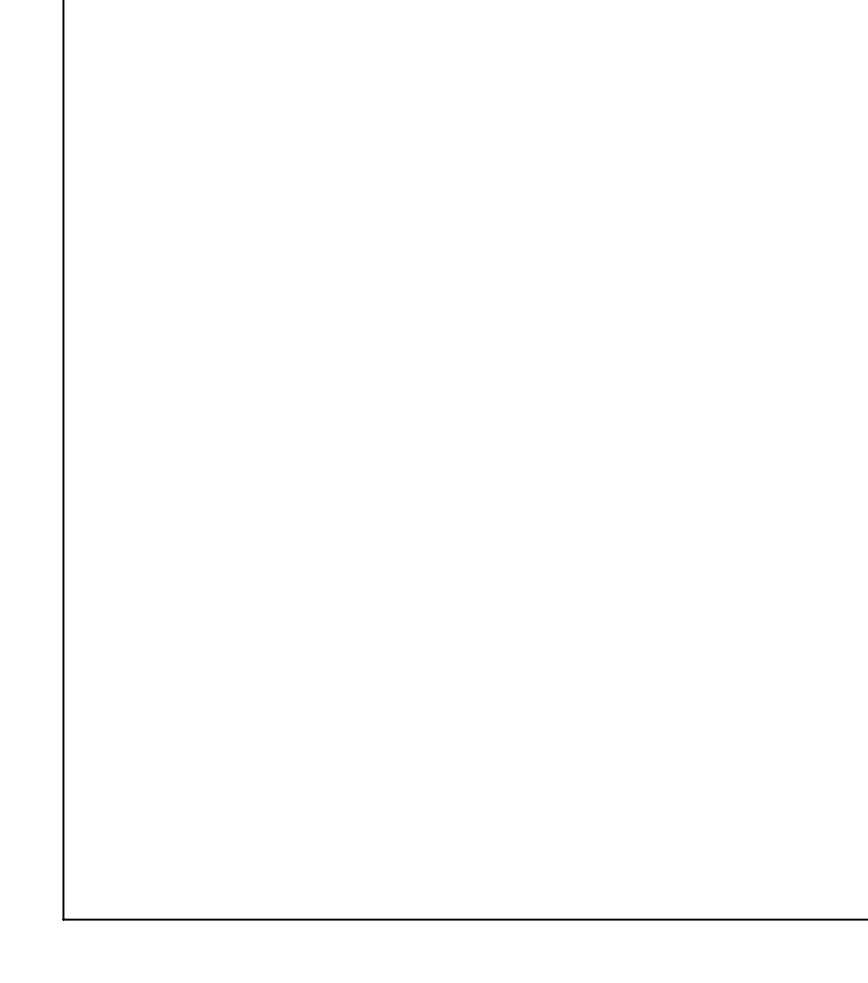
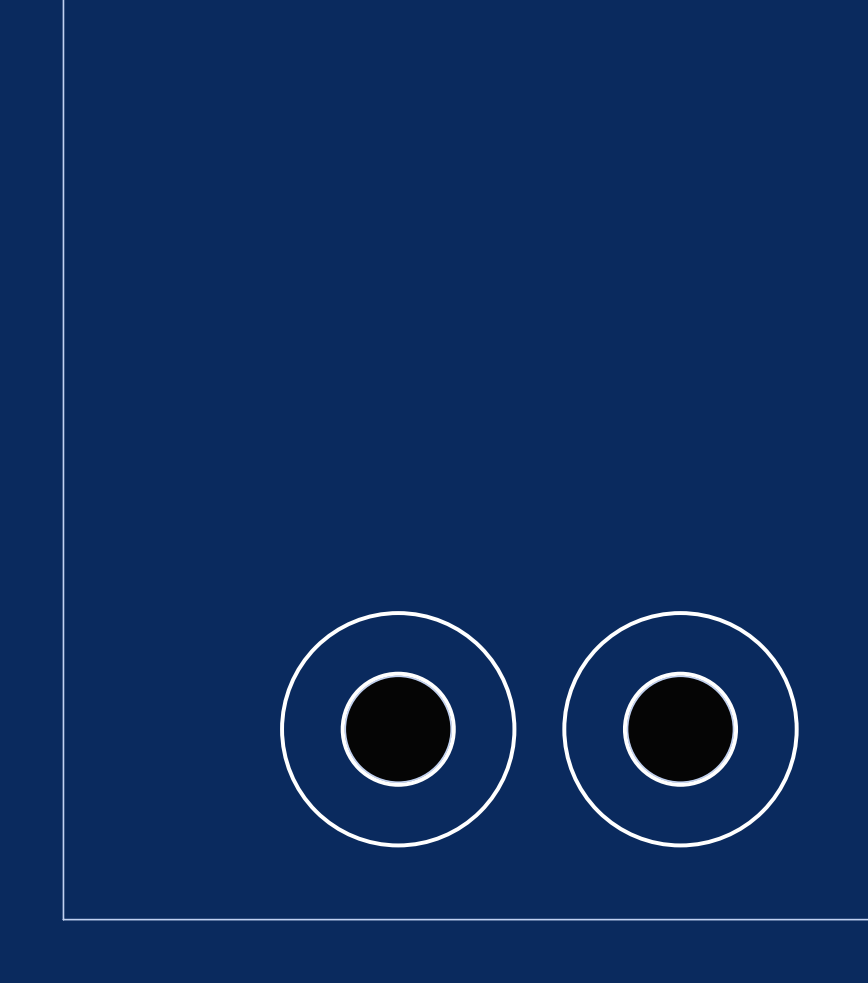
part: none -> (398, 729)
part: none -> (680, 729)

